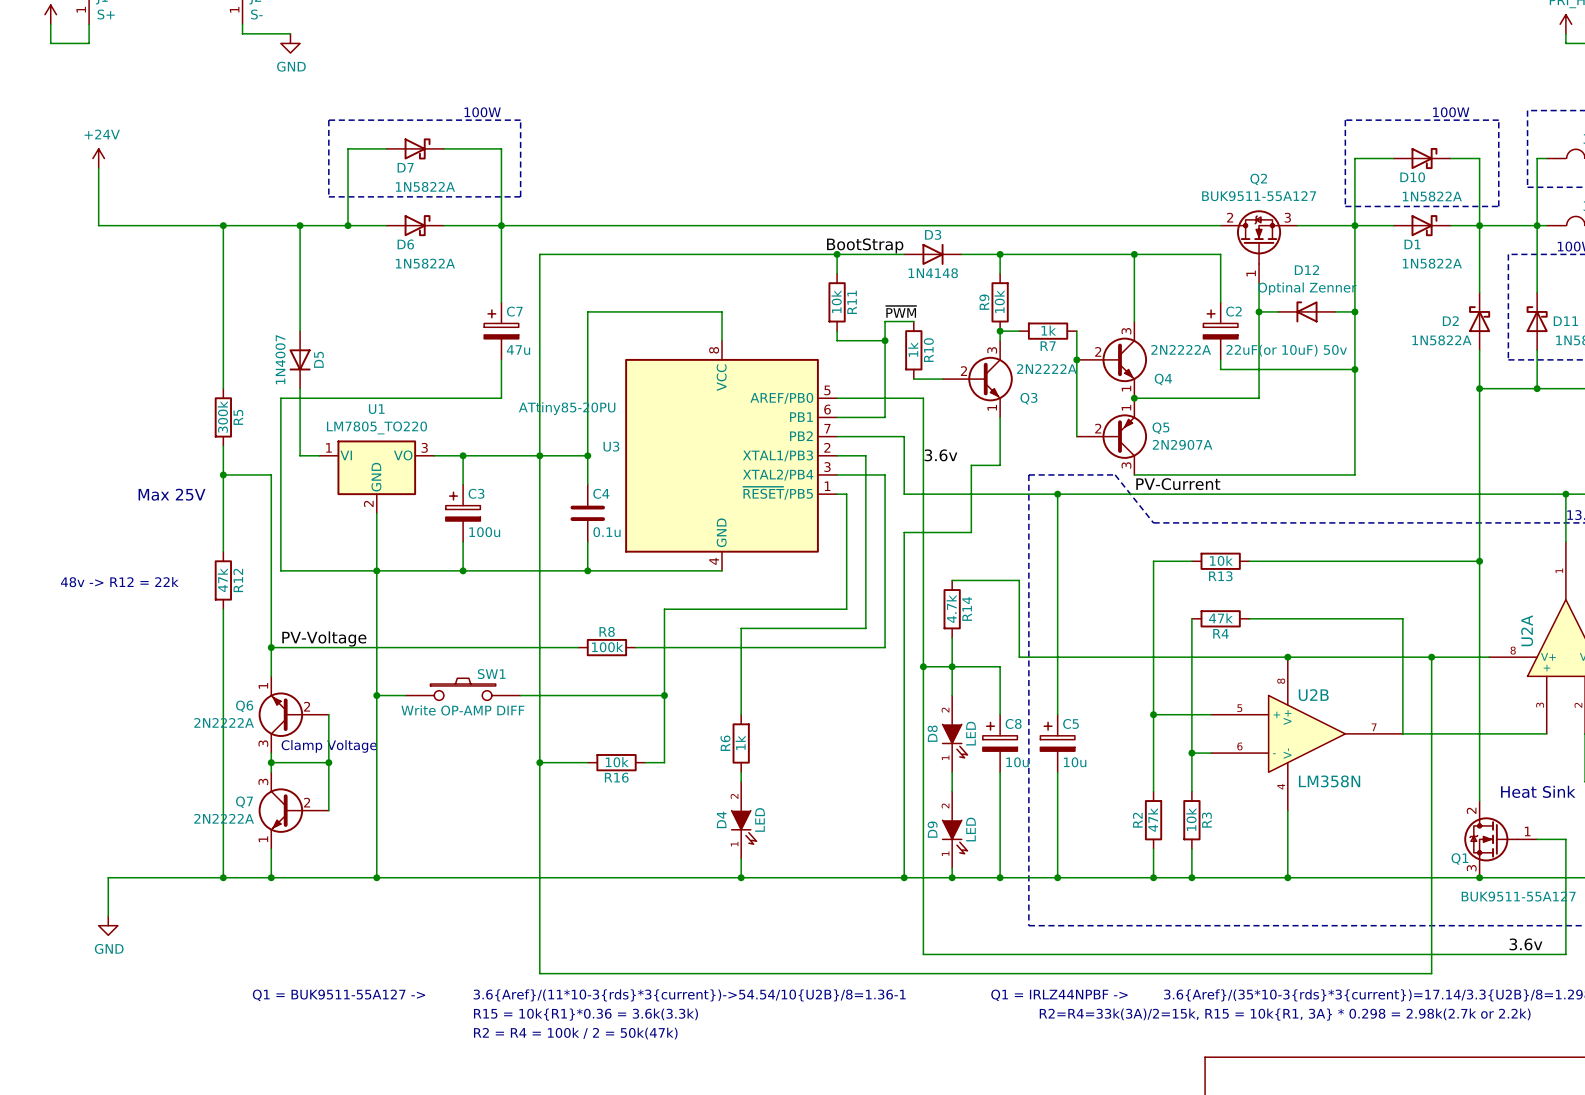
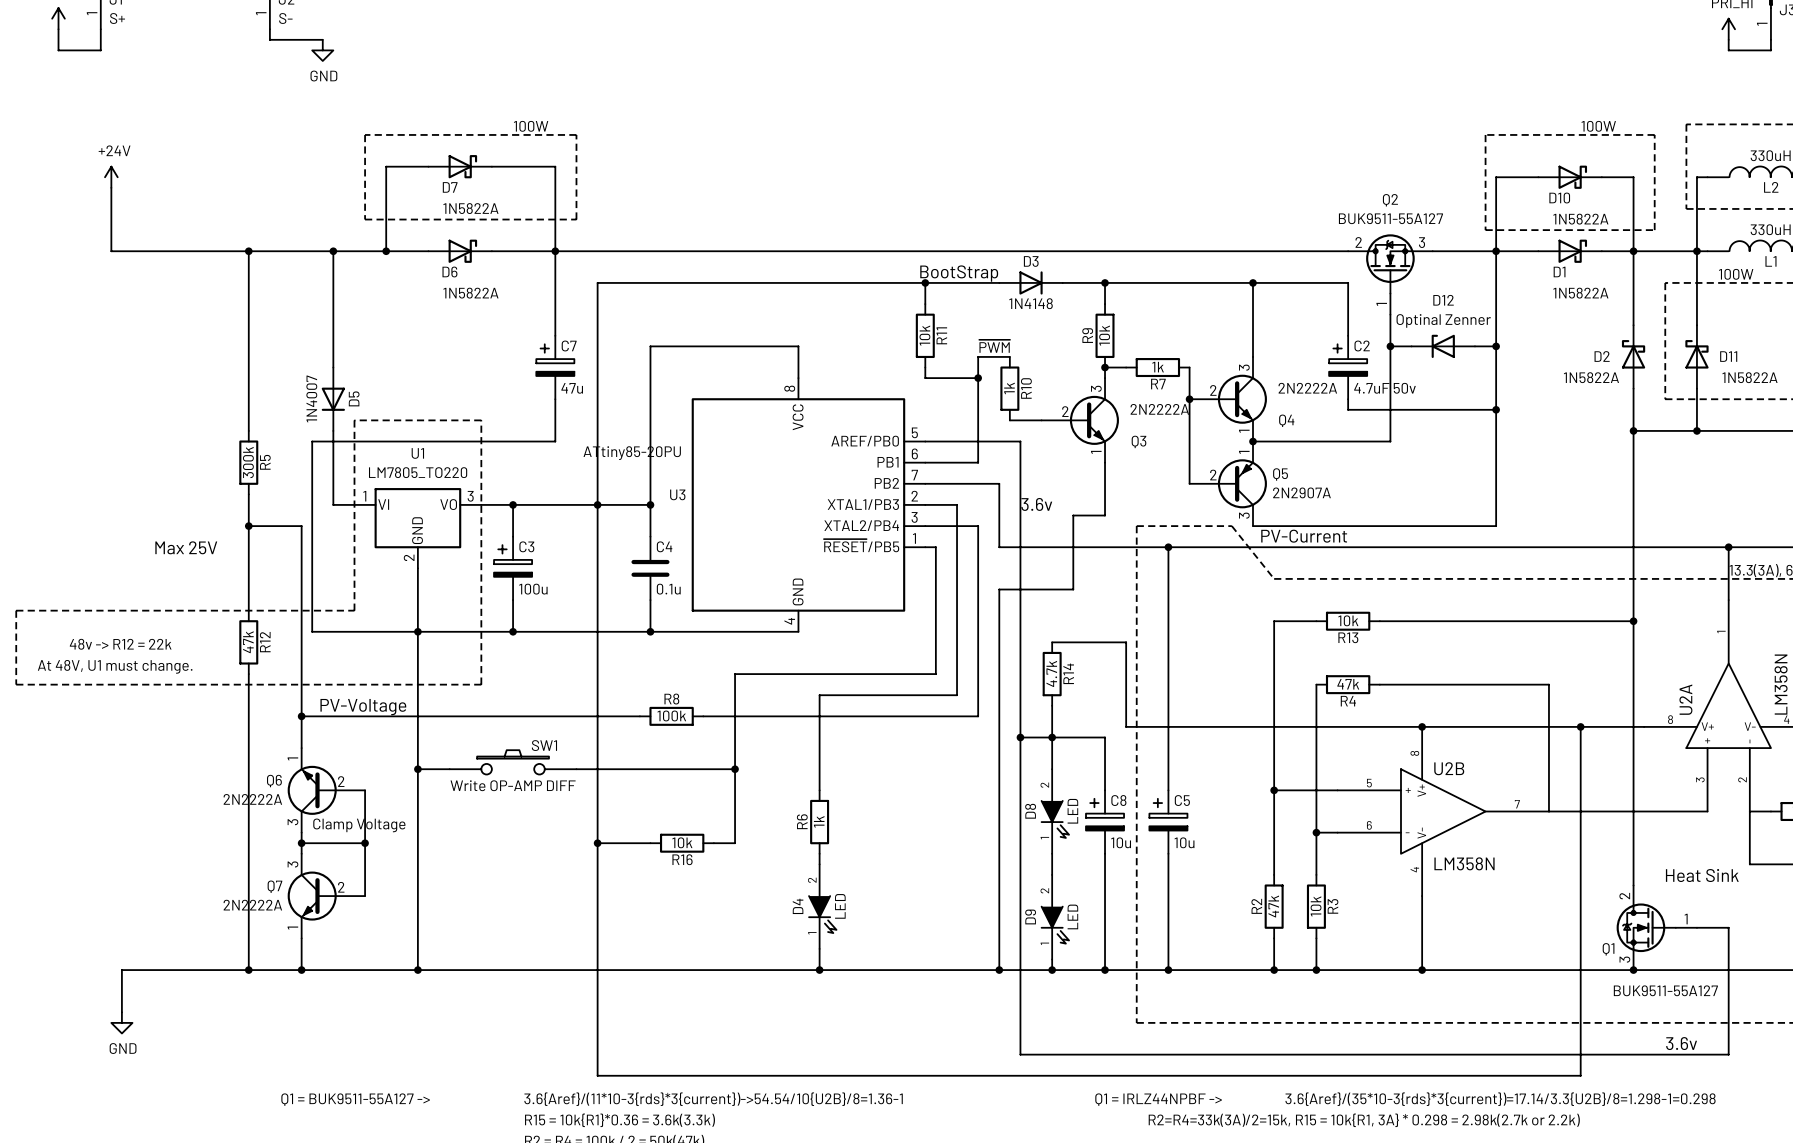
C2 value: 22uF(or 10uF) 50v (1286, 350) -> 4.7uF 50v (1384, 388)
line: none -> (354, 420) (481, 420) (481, 684) (16, 684) (16, 610) (354, 610) (354, 420)
text: none -> At 48V, U1 must change. (115, 666)

